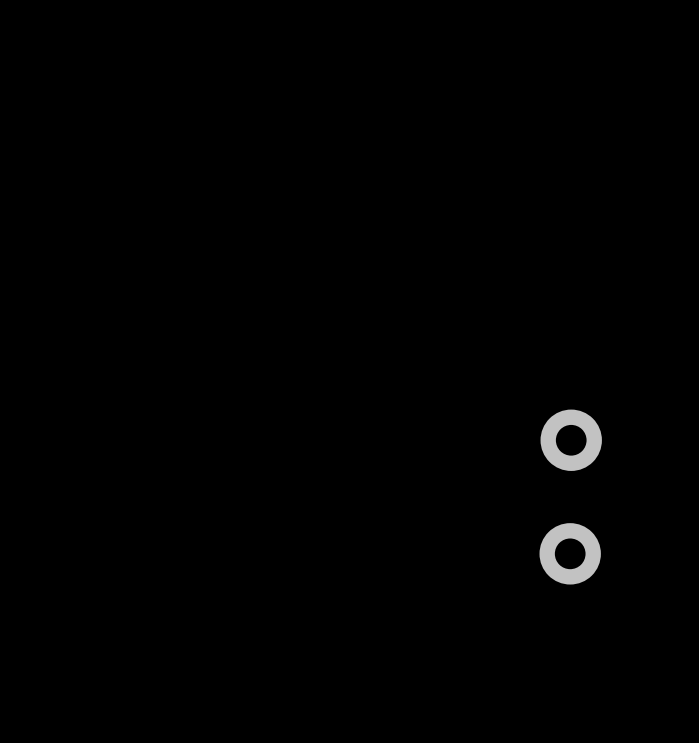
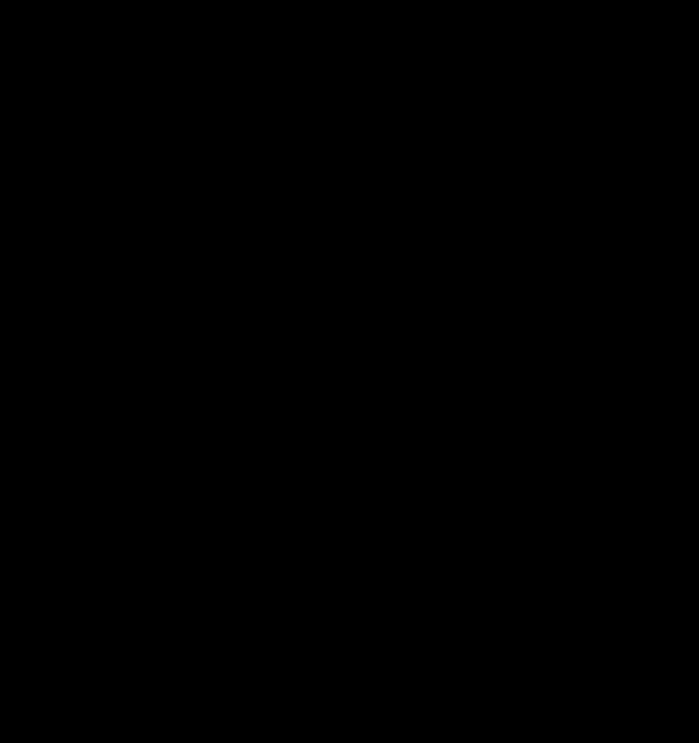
via: (571, 440) -> none
via: (570, 553) -> none

